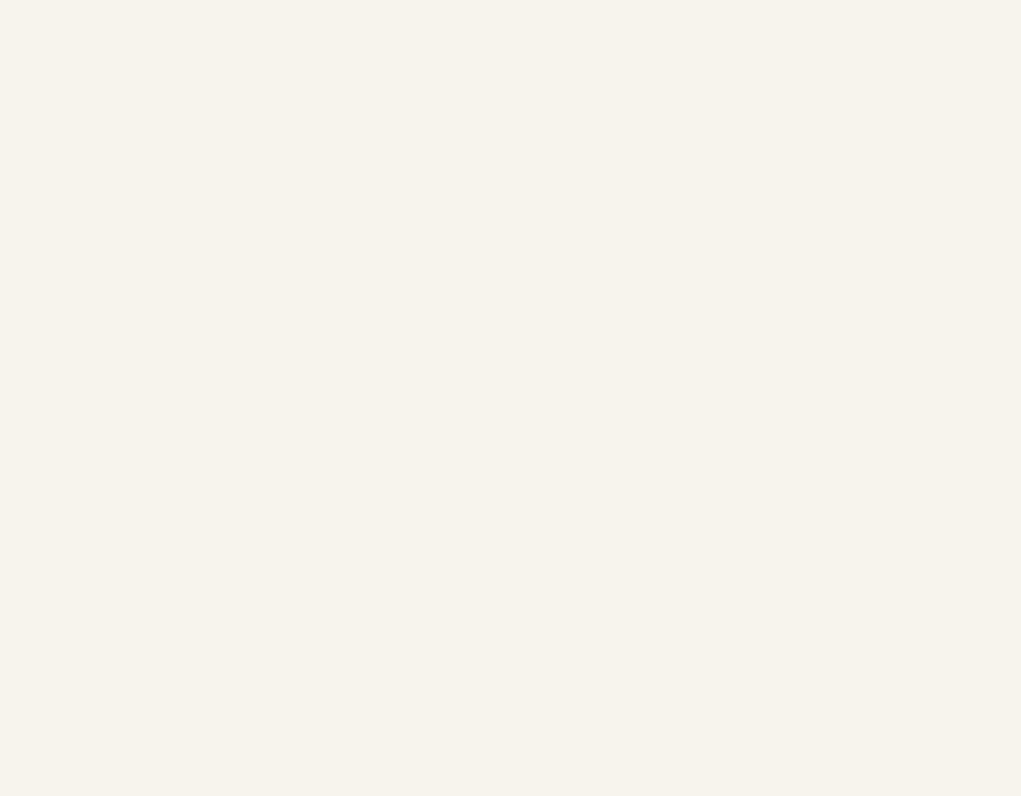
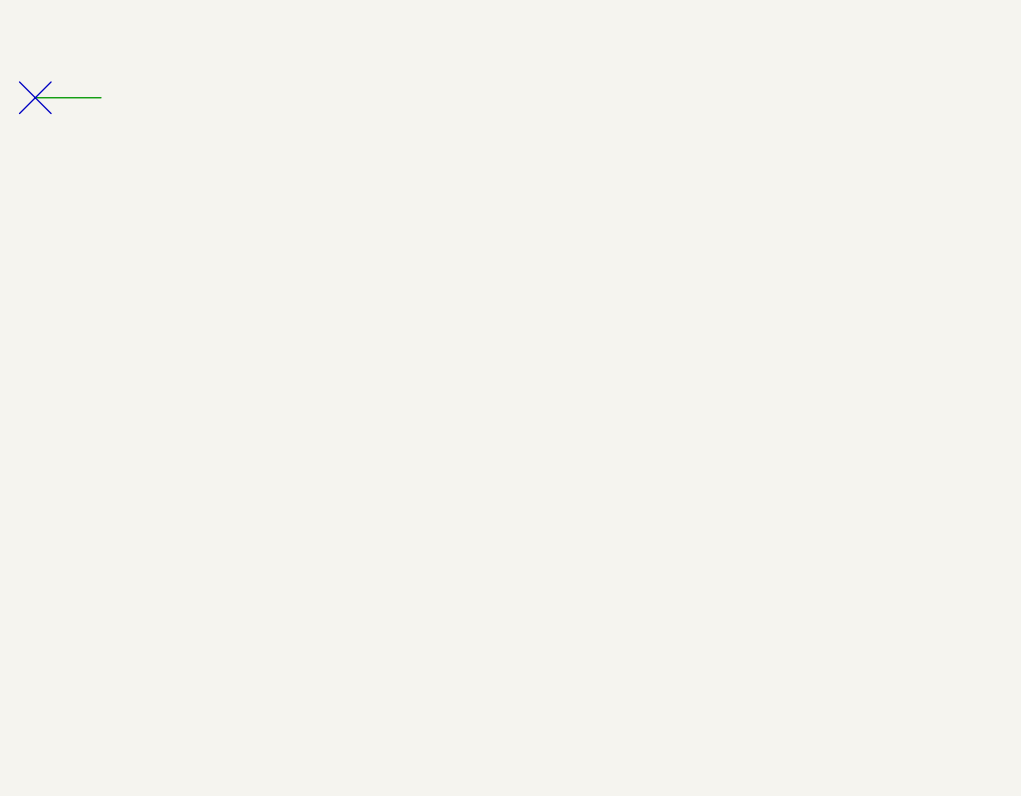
wire: none -> (35, 97) (101, 97)
no-connect mark: none -> (35, 97)

